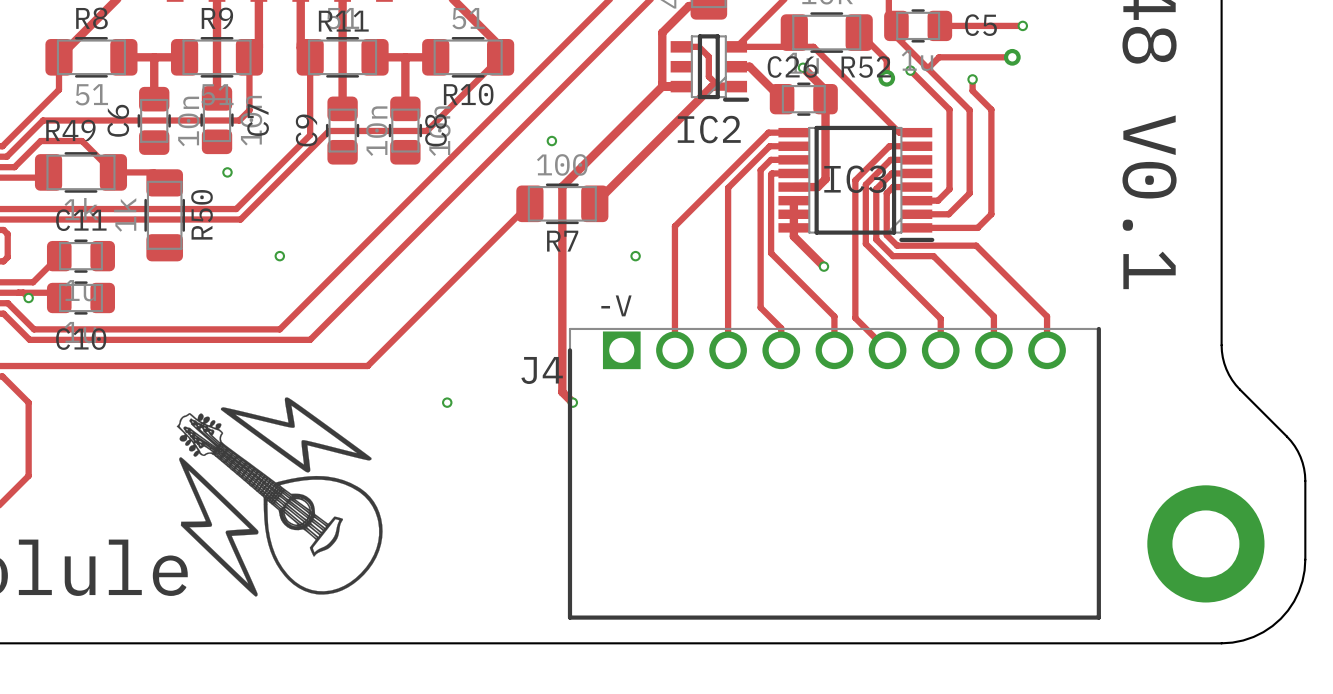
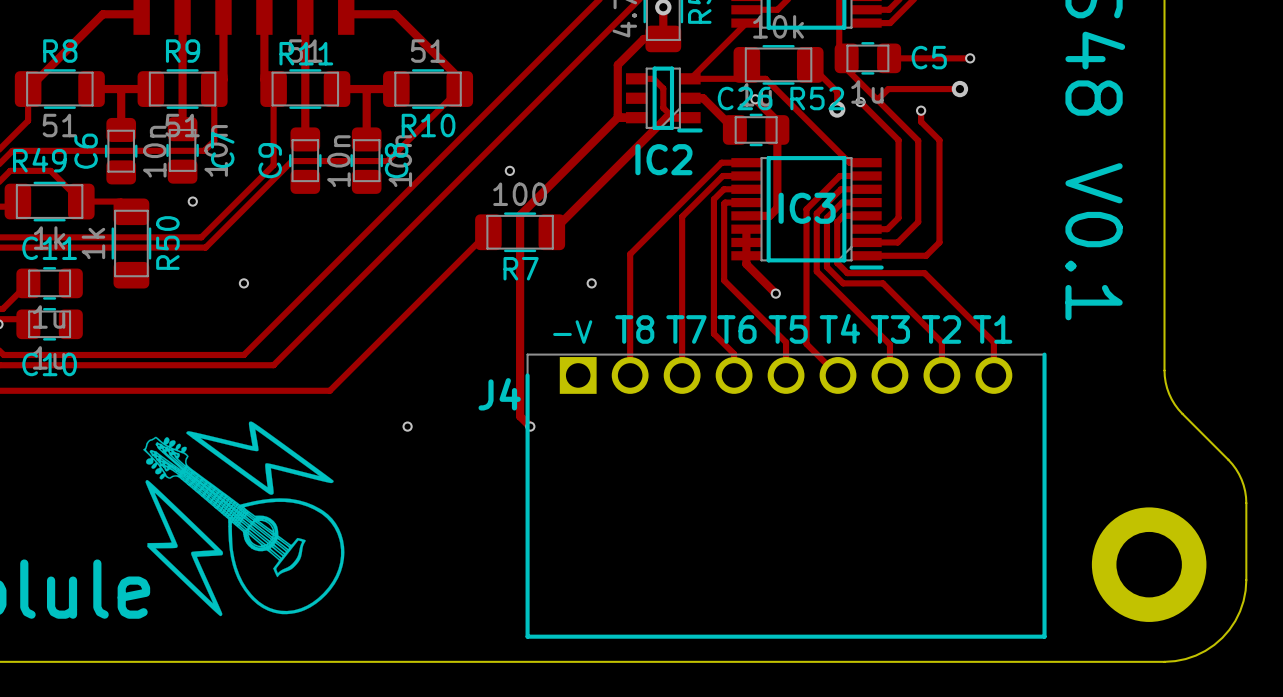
text: none -> T8 (634, 329)
text: none -> T7 (686, 329)
text: none -> T6 (737, 329)
text: none -> T5 (788, 329)
text: none -> T4 (839, 328)
text: none -> T3 (890, 329)
text: none -> T2 (941, 329)
text: none -> T1 (992, 329)

